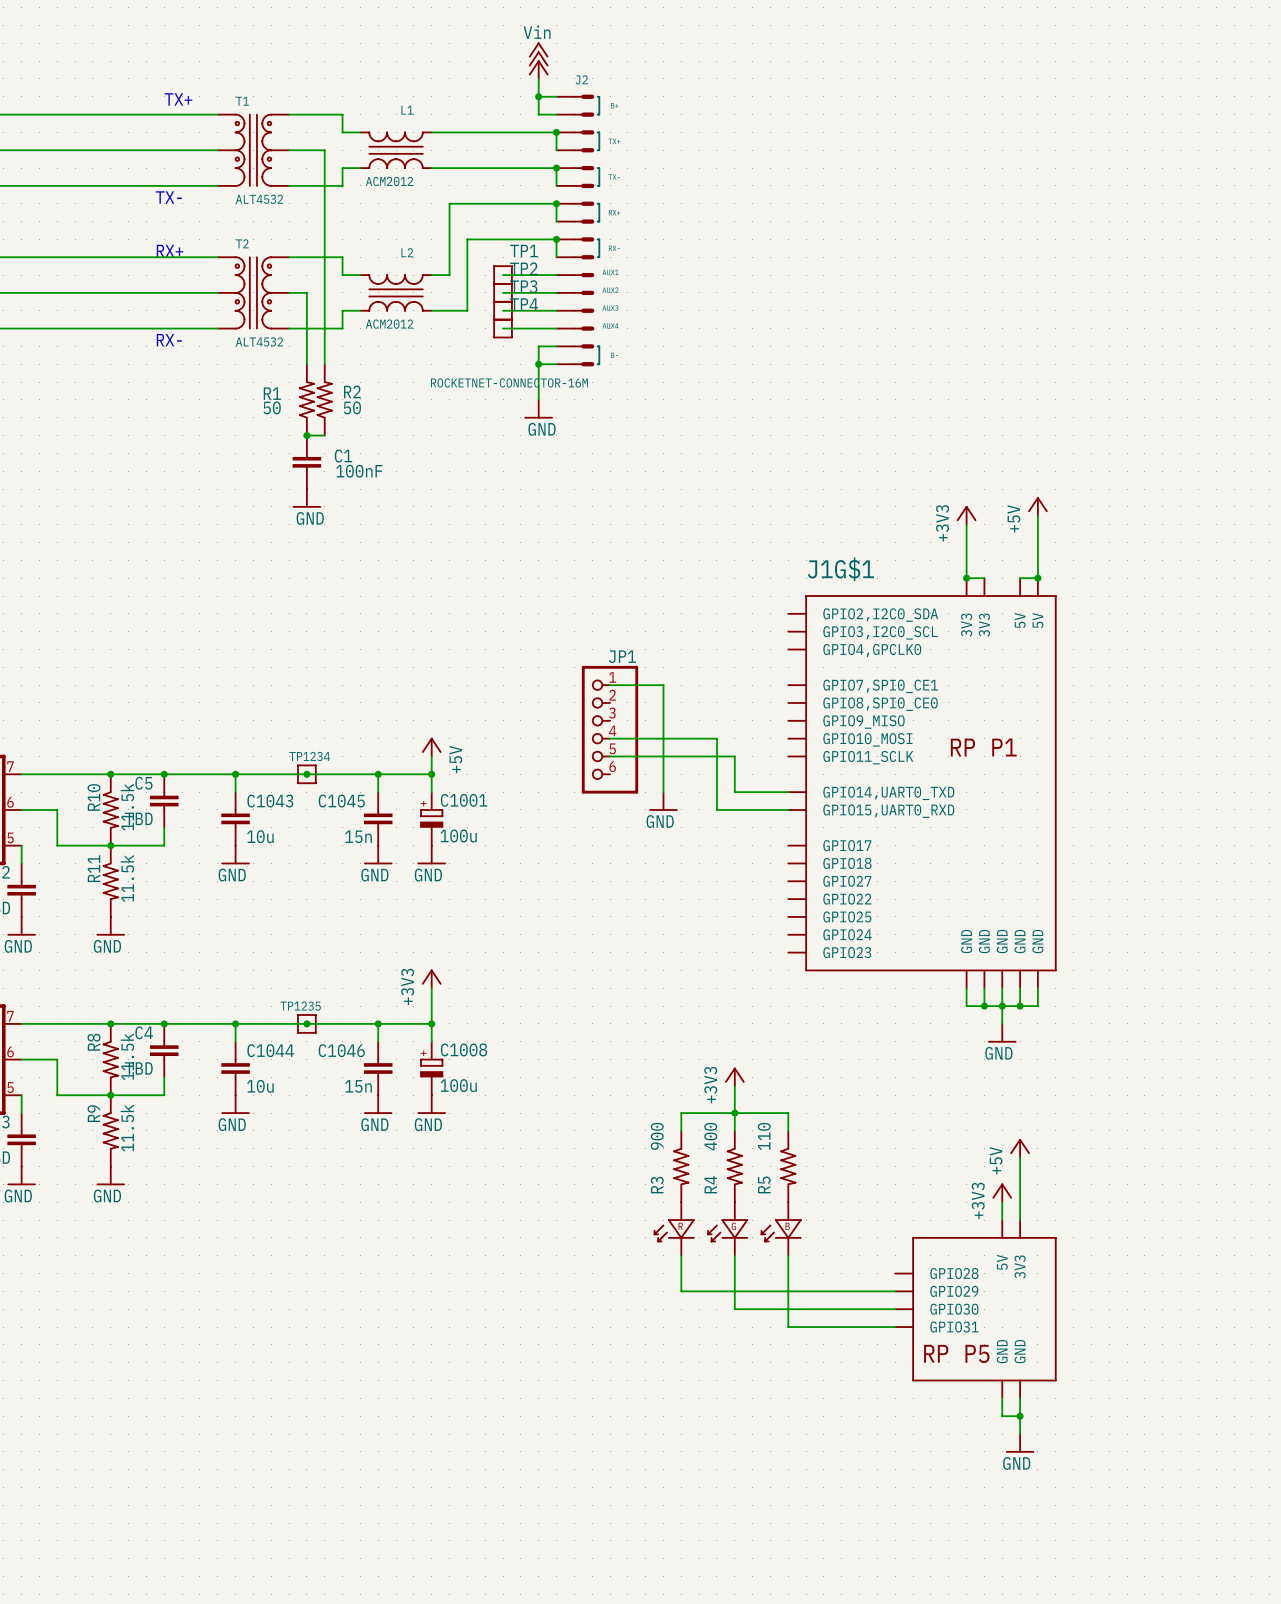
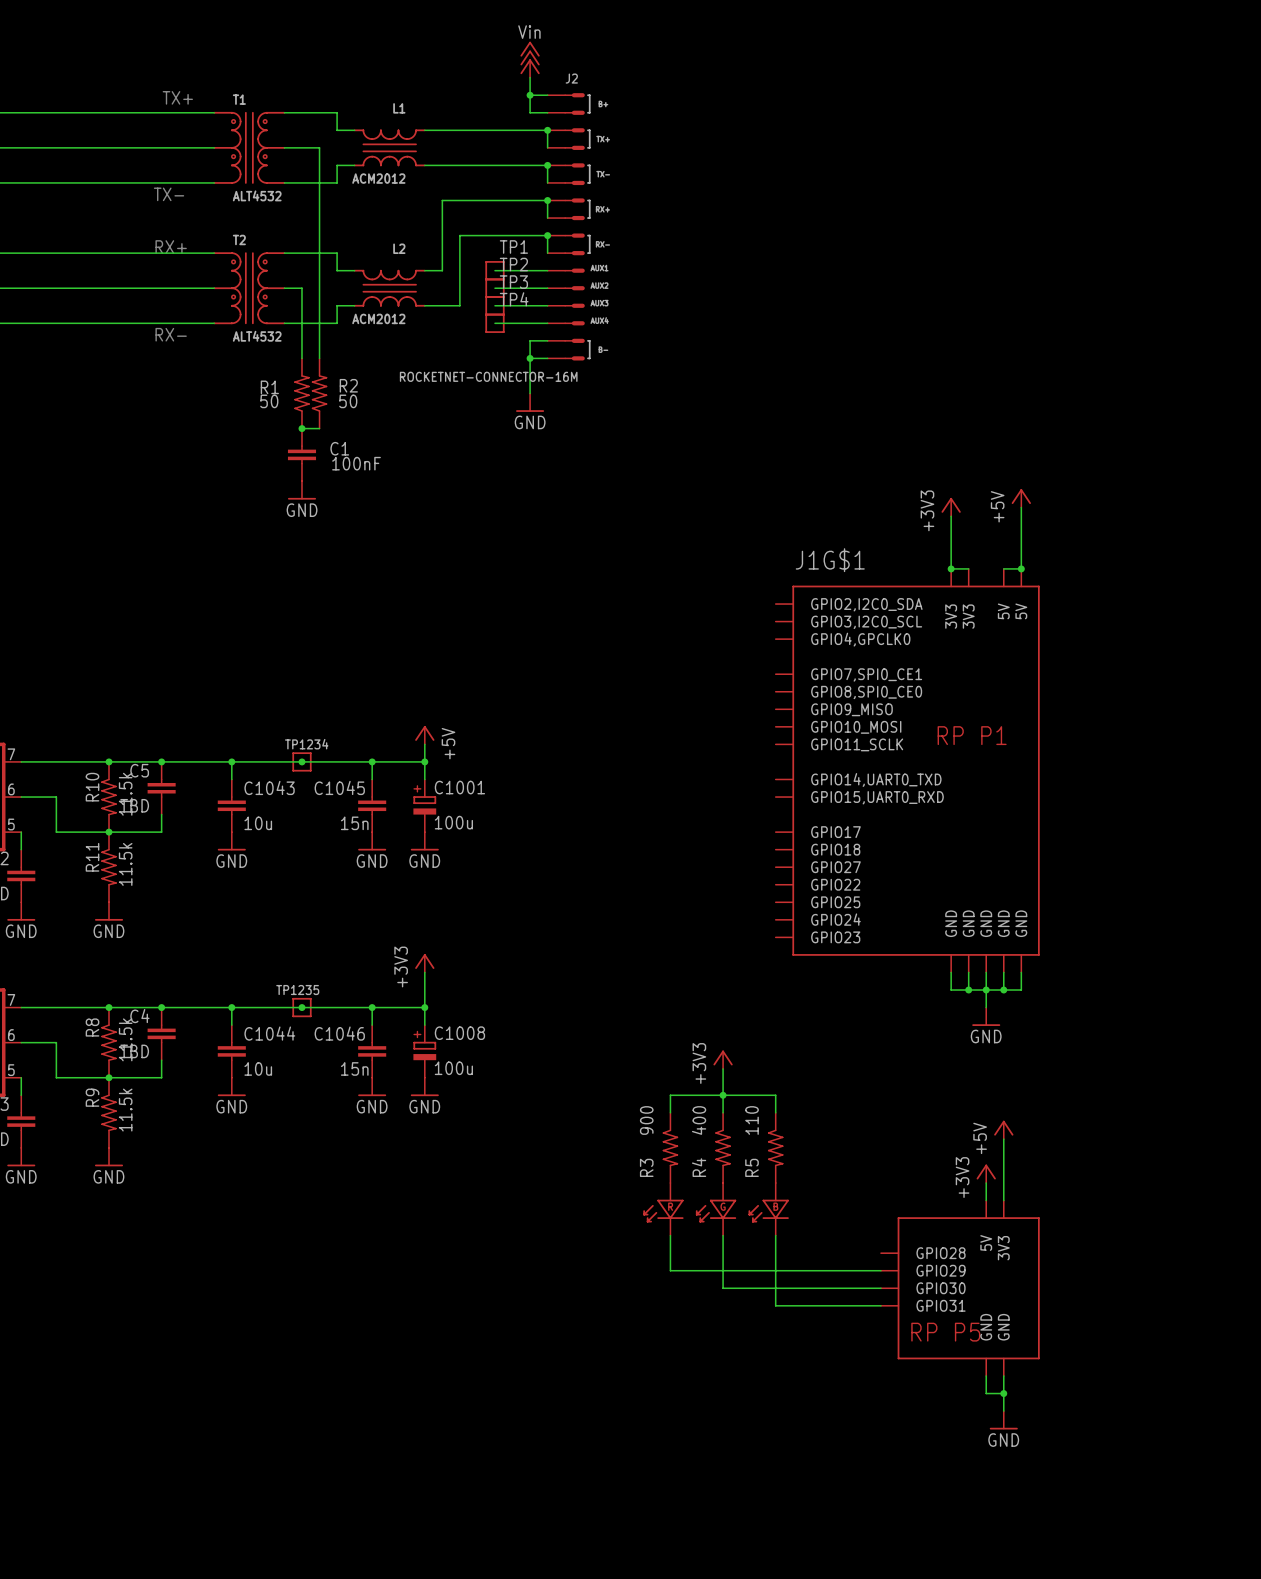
wire: (610, 685) (663, 685) (663, 792) -> none
JP1: (610, 729) -> none
wire: (610, 738) (716, 738) (716, 809) (788, 809) -> none
wire: (610, 756) (734, 756) (734, 792) (788, 792) -> none
power symbol: GND (663, 801) -> none

